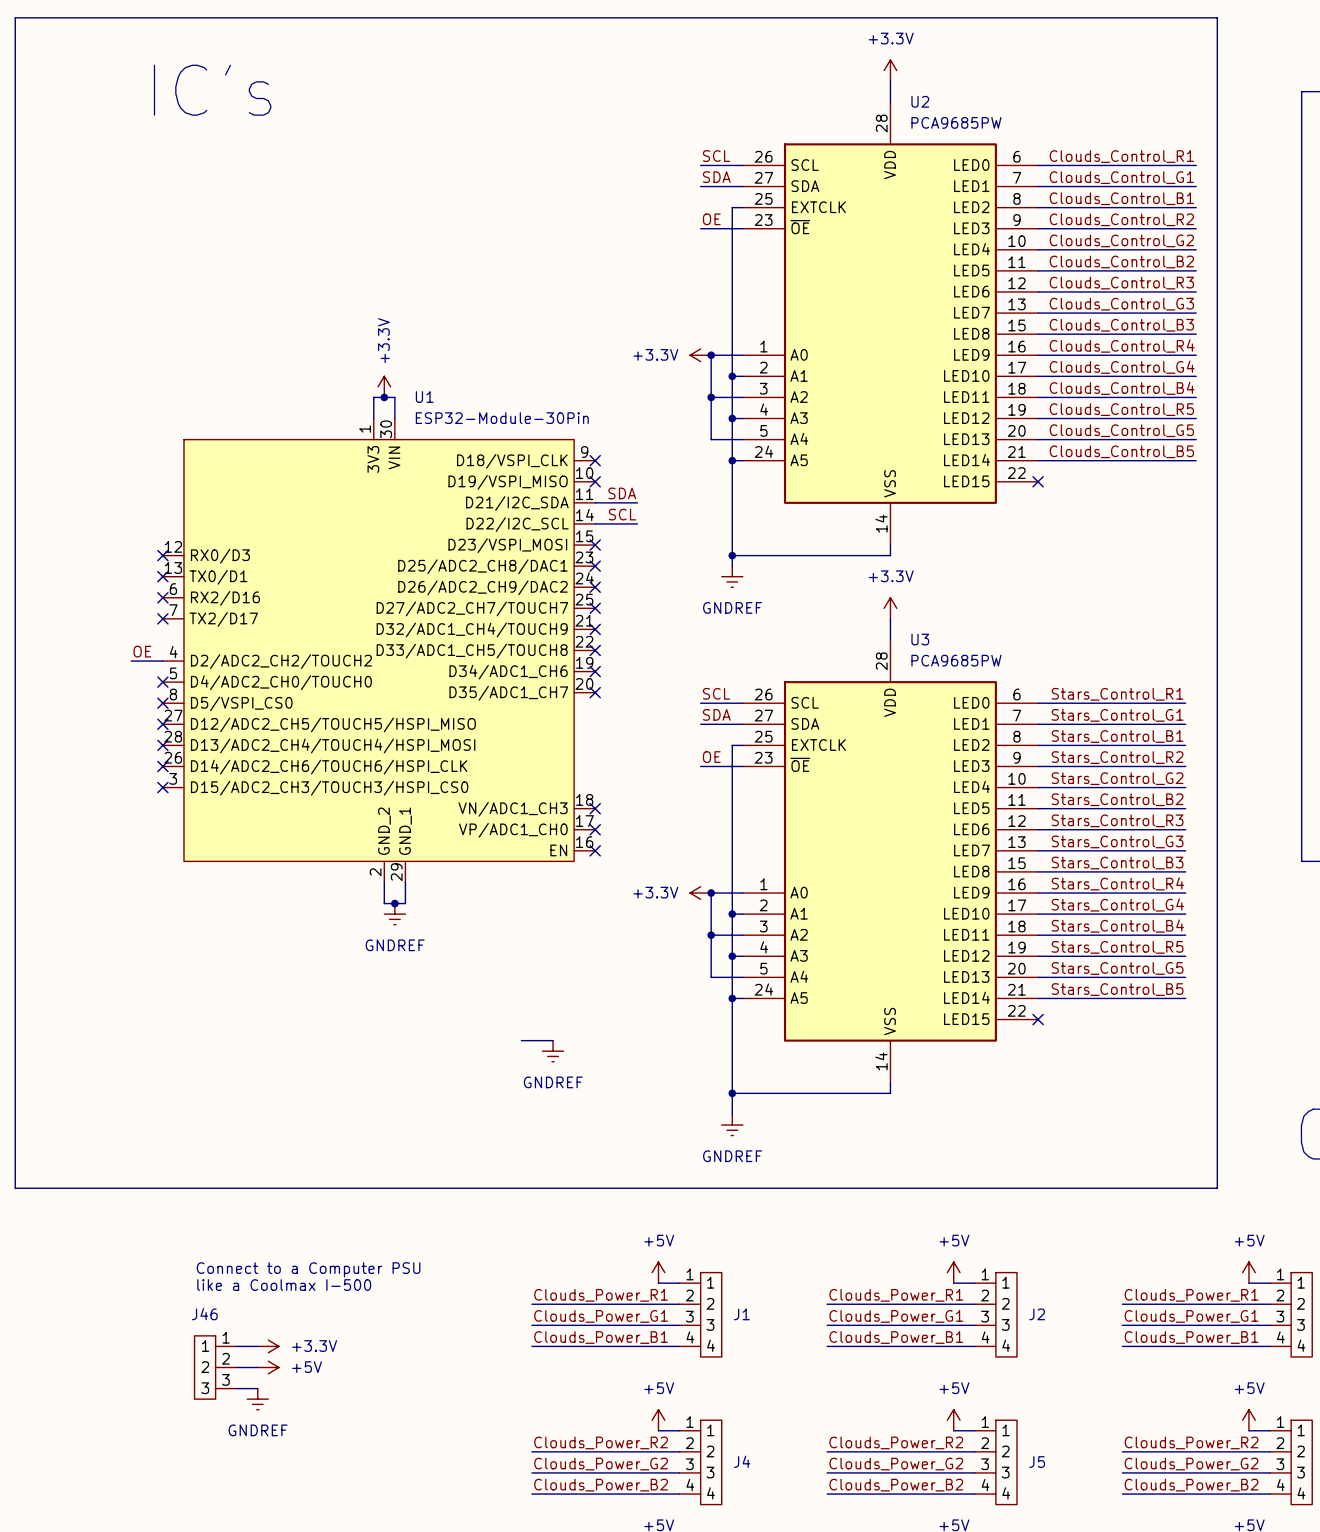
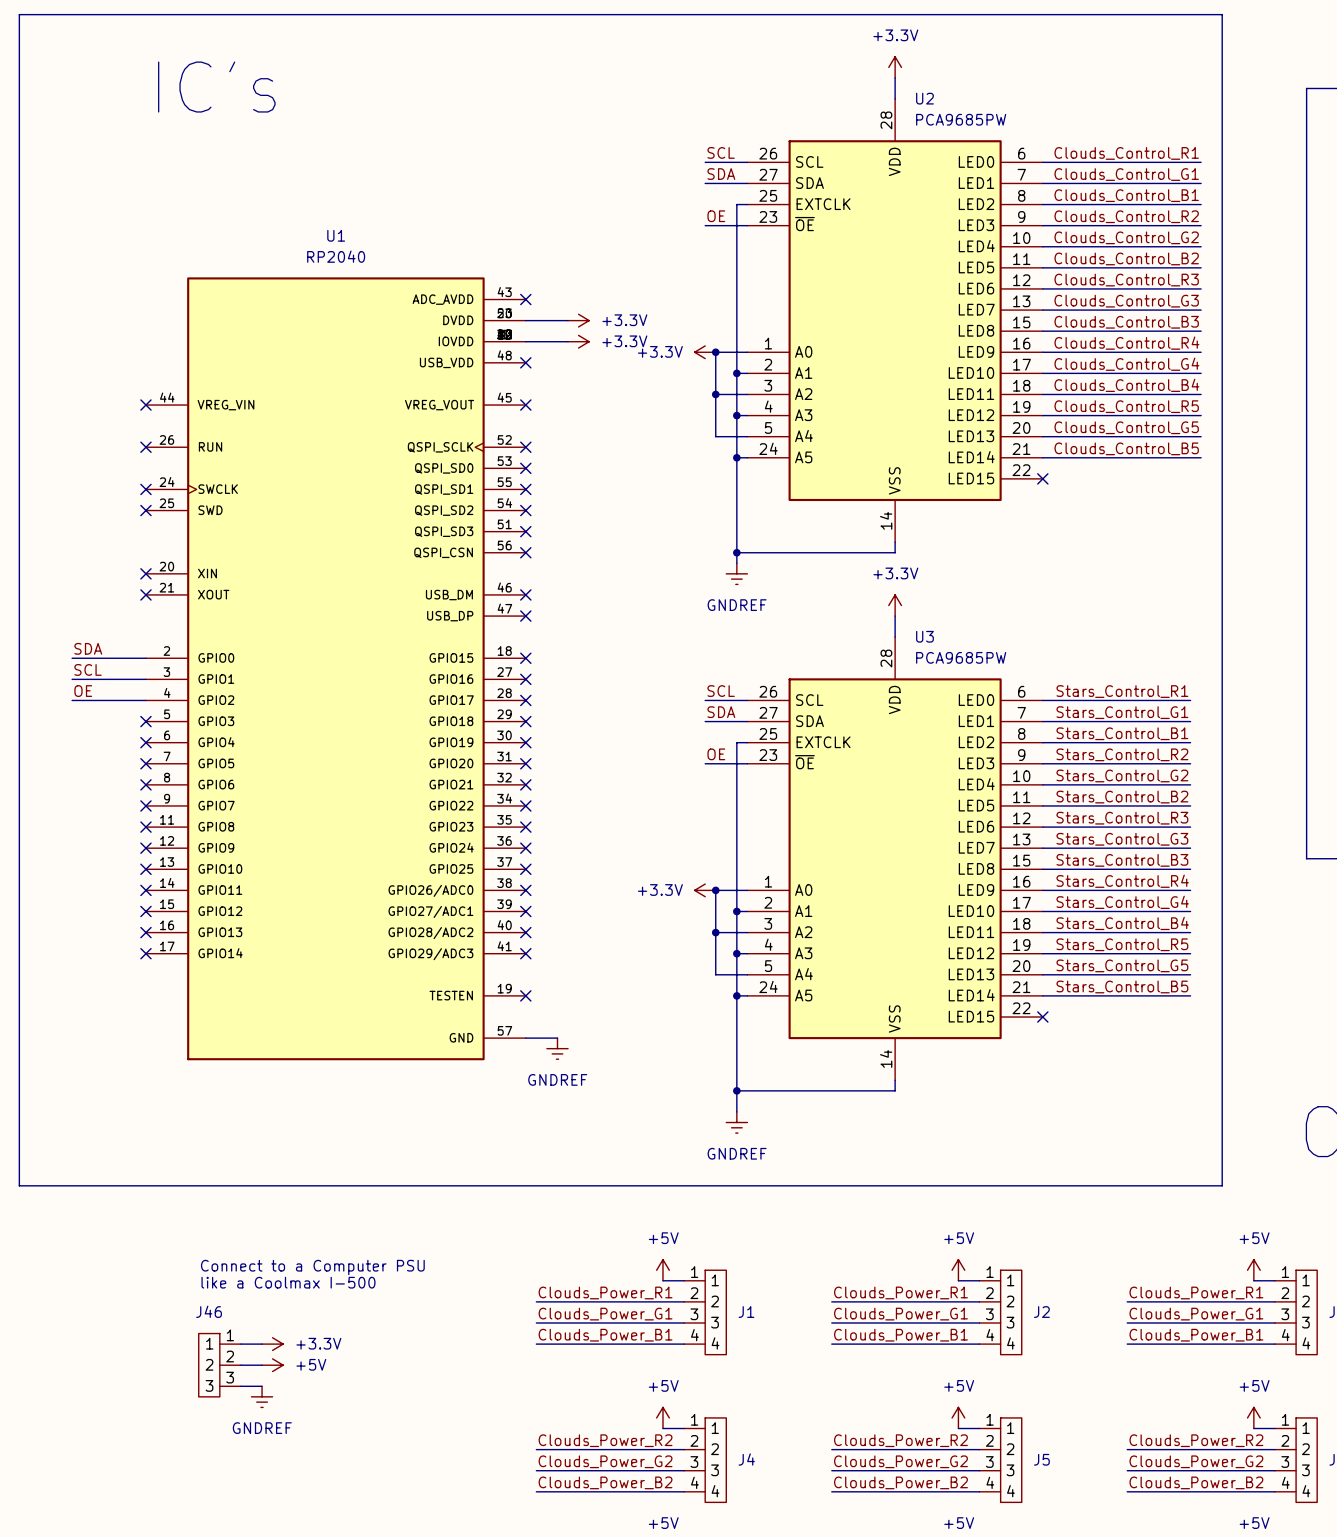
no-connect mark: none -> (525, 299)
power symbol: none -> +3.3V (578, 320)
power symbol: none -> +3.3V (578, 341)
no-connect mark: none -> (525, 362)
power symbol: +3.3V (384, 386) -> none
junction: (384, 397) -> none
U1 name position: U1 (424, 397) -> U1 (336, 235)
no-connect mark: none -> (145, 405)
no-connect mark: none -> (525, 405)
U1 symbol: [162, 418, 596, 883] -> [145, 277, 526, 1061]
U1 value: ESP32-Module-30Pin (502, 418) -> RP2040 (336, 256)
no-connect mark: none -> (145, 447)
no-connect mark: none -> (525, 447)
no-connect mark: (595, 460) -> none
no-connect mark: none -> (525, 468)
no-connect mark: (595, 481) -> none
no-connect mark: none -> (145, 489)
no-connect mark: none -> (525, 489)
label: SDA (622, 493) -> none
wire: (595, 502) (637, 502) -> (525, 320) (568, 320)
no-connect mark: none -> (145, 510)
no-connect mark: none -> (525, 510)
label: SCL (622, 514) -> none
wire: (595, 523) (637, 523) -> (525, 341) (568, 341)
no-connect mark: none -> (525, 531)
no-connect mark: (595, 545) -> none
no-connect mark: (162, 555) -> none
no-connect mark: none -> (525, 552)
no-connect mark: (595, 566) -> none
no-connect mark: none -> (145, 573)
no-connect mark: (162, 576) -> none
no-connect mark: (595, 587) -> none
no-connect mark: none -> (145, 594)
no-connect mark: (162, 597) -> none
no-connect mark: none -> (525, 594)
no-connect mark: (595, 608) -> none
no-connect mark: (162, 618) -> none
no-connect mark: none -> (525, 616)
no-connect mark: (595, 629) -> none
no-connect mark: (595, 650) -> none
label: none -> SDA (88, 648)
label position: OE (142, 651) -> OE (83, 691)
wire: none -> (72, 658) (135, 658)
no-connect mark: none -> (525, 658)
no-connect mark: (595, 671) -> none
label: none -> SCL (88, 669)
wire: none -> (72, 679) (145, 679)
no-connect mark: (162, 682) -> none
no-connect mark: none -> (525, 679)
no-connect mark: (595, 692) -> none
wire: none -> (72, 700) (145, 700)
no-connect mark: (162, 703) -> none
no-connect mark: none -> (525, 700)
no-connect mark: none -> (145, 721)
no-connect mark: (162, 724) -> none
no-connect mark: none -> (525, 721)
no-connect mark: none -> (145, 742)
no-connect mark: (162, 745) -> none
no-connect mark: none -> (525, 742)
no-connect mark: none -> (145, 763)
no-connect mark: (162, 766) -> none
no-connect mark: none -> (525, 763)
no-connect mark: none -> (145, 784)
no-connect mark: (162, 787) -> none
no-connect mark: none -> (525, 784)
no-connect mark: none -> (145, 805)
no-connect mark: none -> (525, 805)
no-connect mark: (595, 808) -> none
no-connect mark: none -> (145, 827)
no-connect mark: none -> (525, 827)
no-connect mark: (595, 829) -> none
no-connect mark: none -> (145, 848)
no-connect mark: none -> (525, 848)
no-connect mark: (595, 850) -> none
no-connect mark: none -> (145, 869)
no-connect mark: none -> (525, 869)
no-connect mark: none -> (145, 890)
no-connect mark: none -> (525, 890)
junction: (394, 903) -> none
no-connect mark: none -> (145, 911)
power symbol: GNDREF (394, 914) -> none
no-connect mark: none -> (525, 911)
no-connect mark: none -> (145, 932)
no-connect mark: none -> (525, 932)
no-connect mark: none -> (145, 953)
no-connect mark: none -> (525, 953)
no-connect mark: none -> (525, 995)

